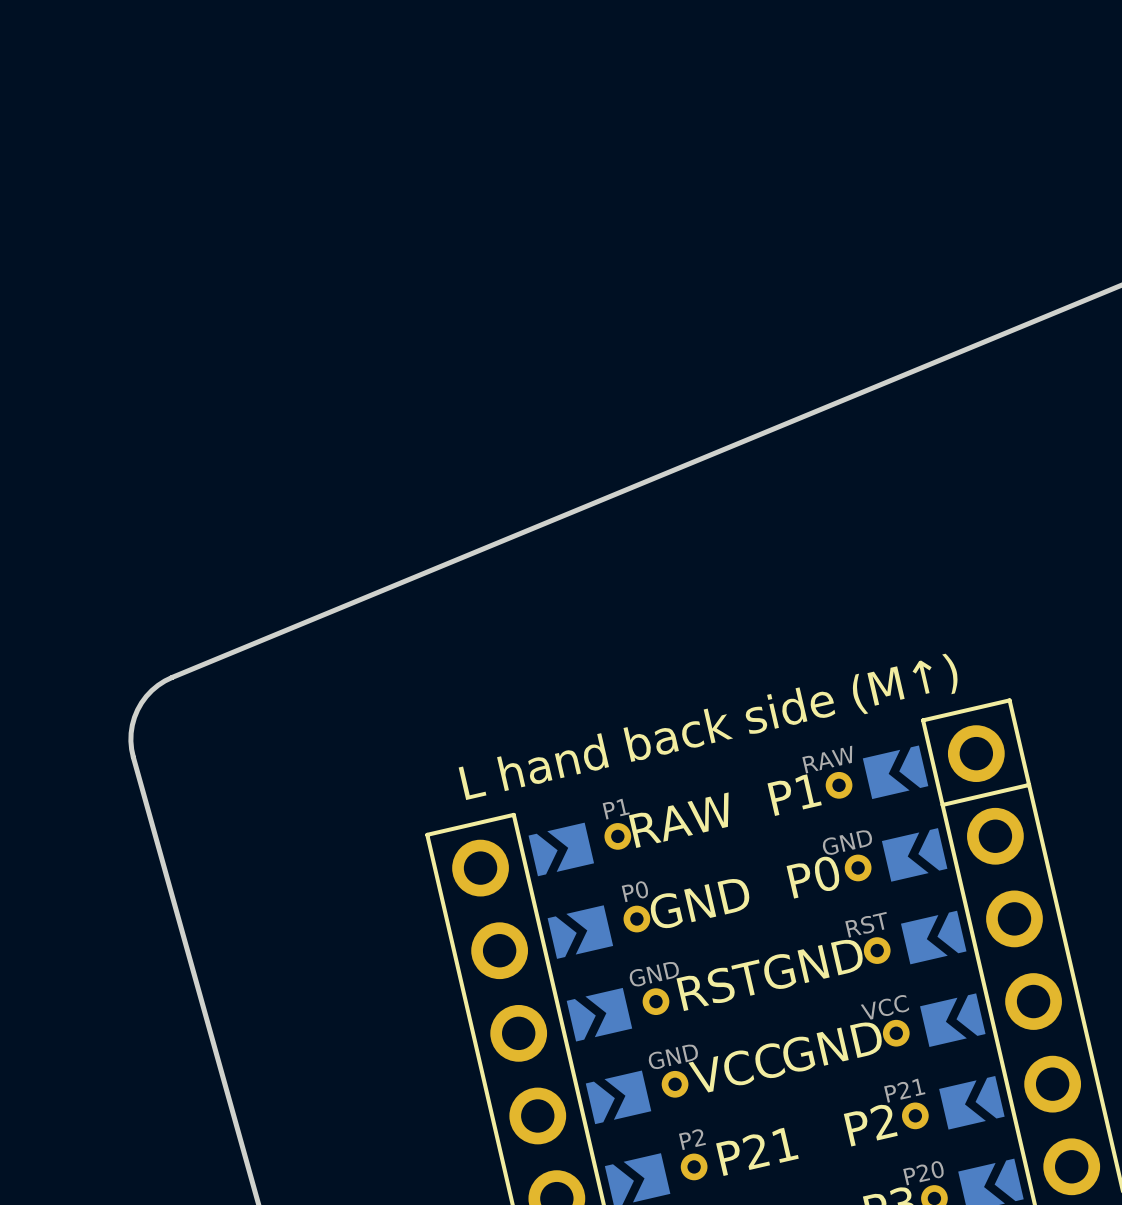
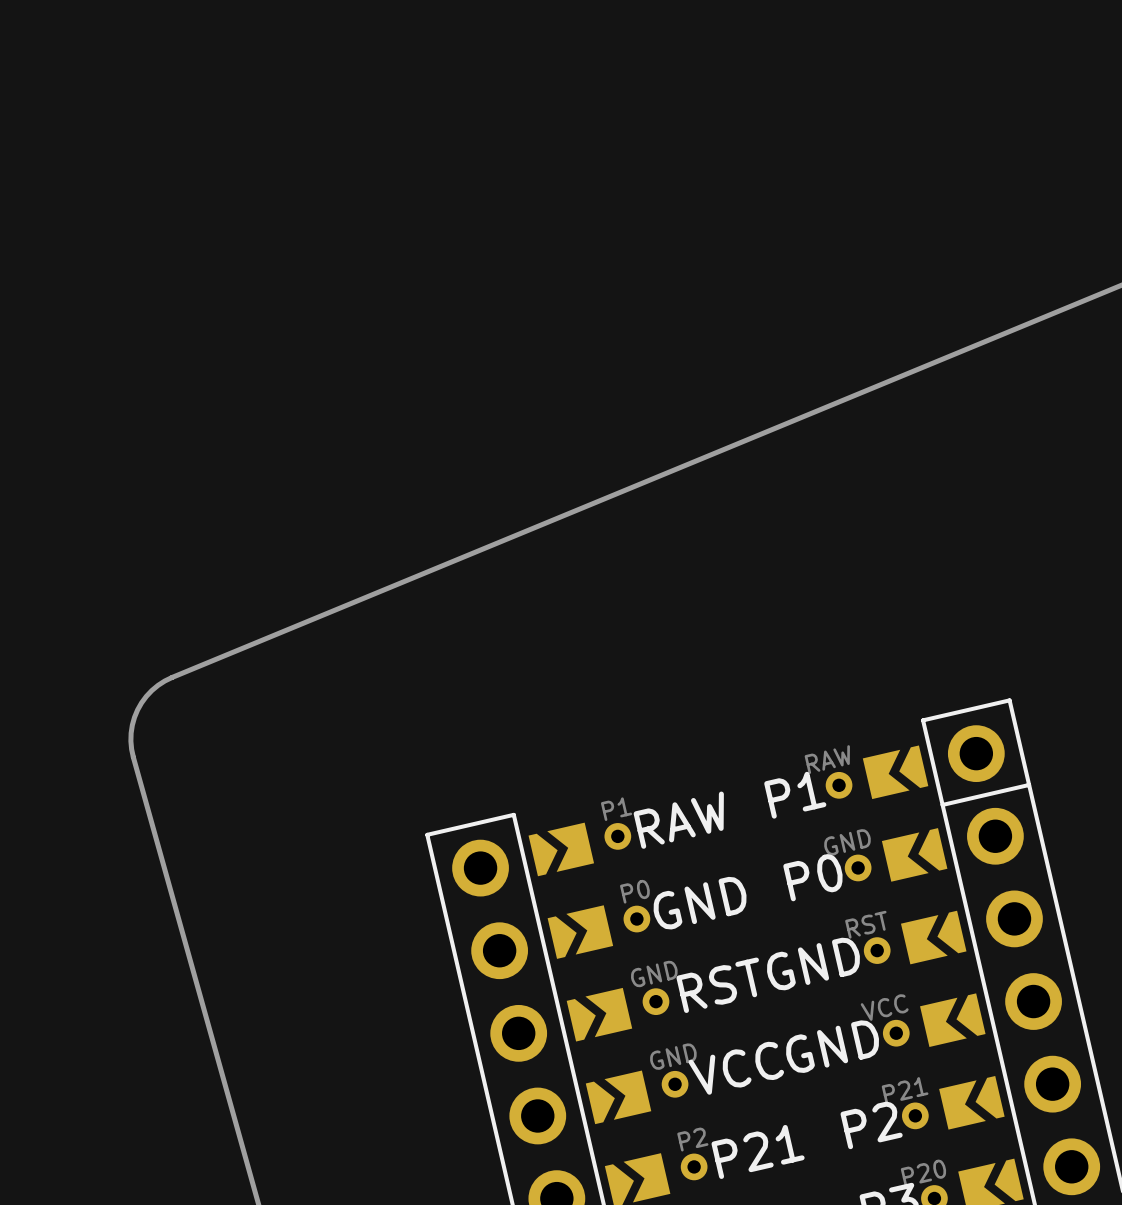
part text: L hand back side (M↑) (708, 726) -> none

